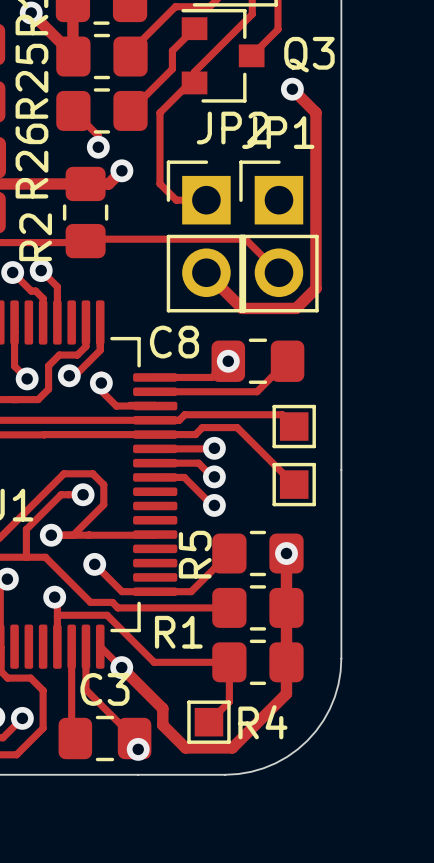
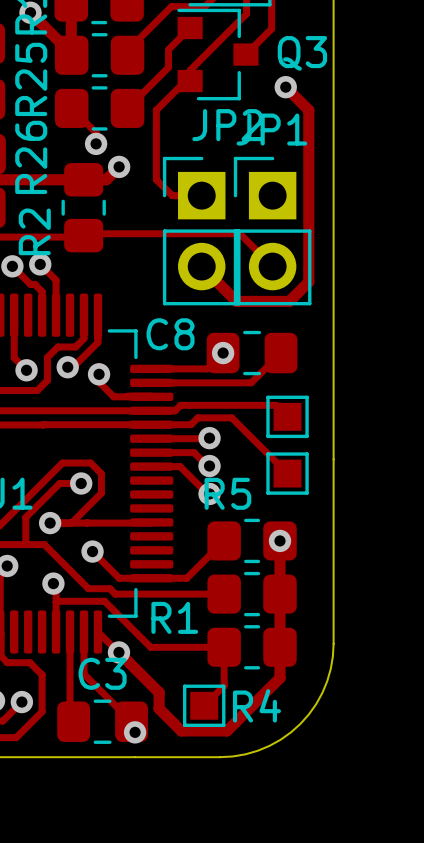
R5 name rotation: 0° (195, 554) -> 90° clockwise (227, 493)

